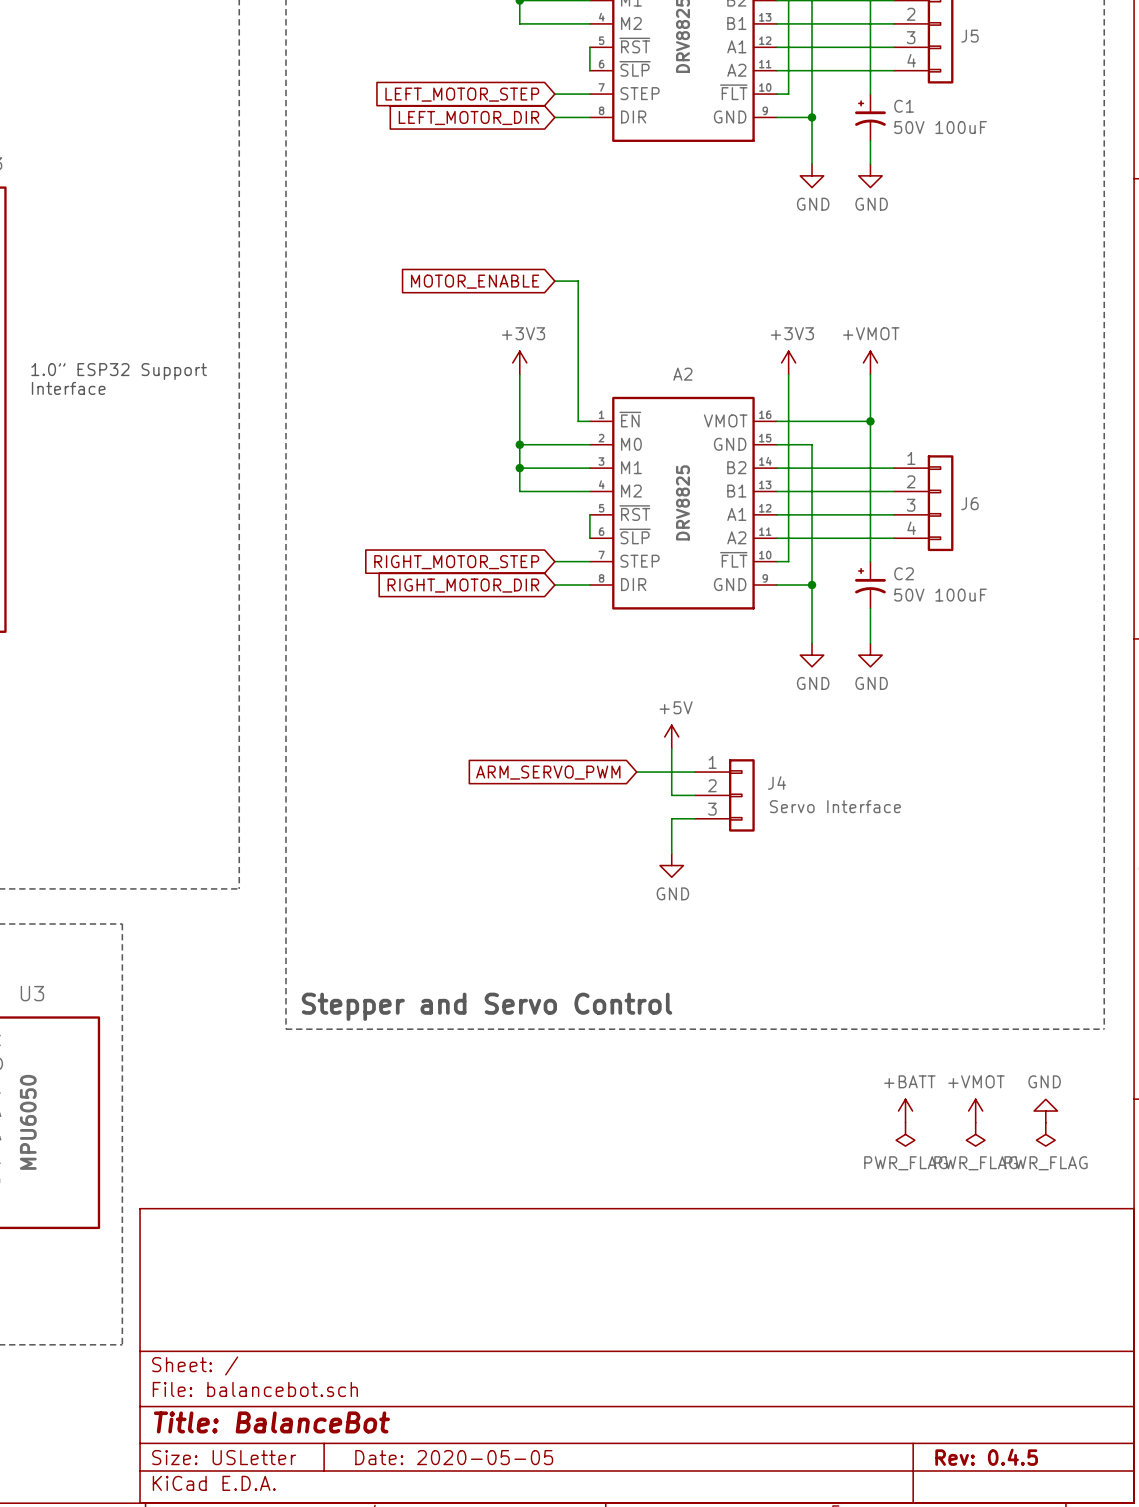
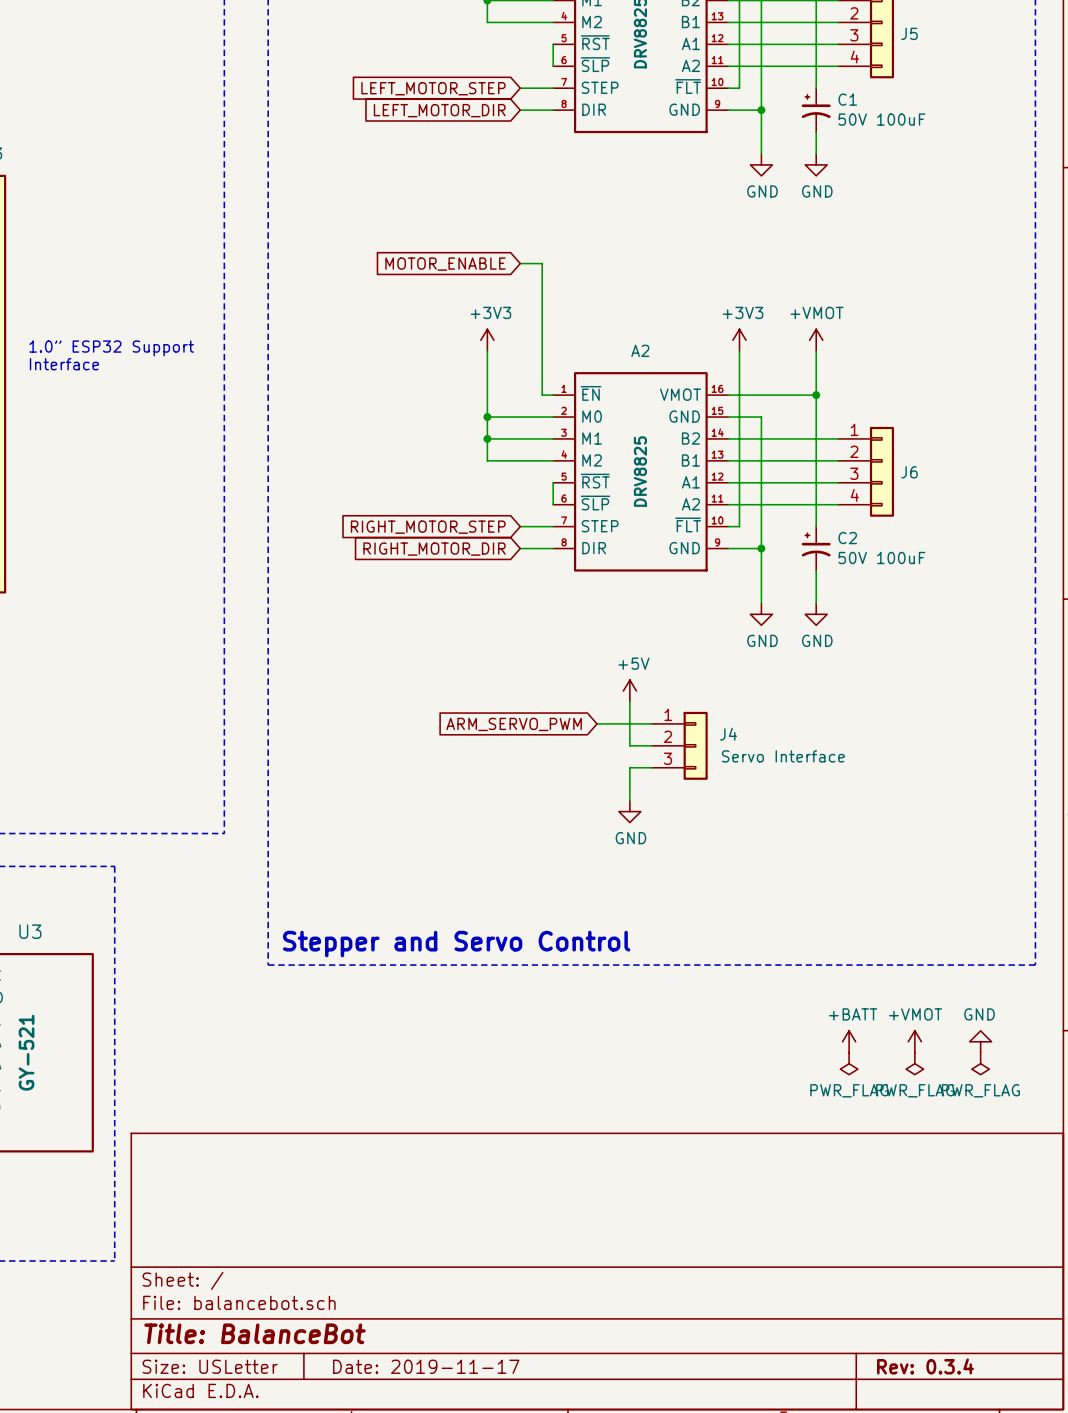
U3 value: MPU6050 (28, 1122) -> GY-521 (26, 1052)
title block: Date: 2020-05-05 (454, 1457) -> Date: 2019-11-17 (426, 1366)
title block: Rev: 0.4.5 (986, 1457) -> Rev: 0.3.4 (925, 1366)

